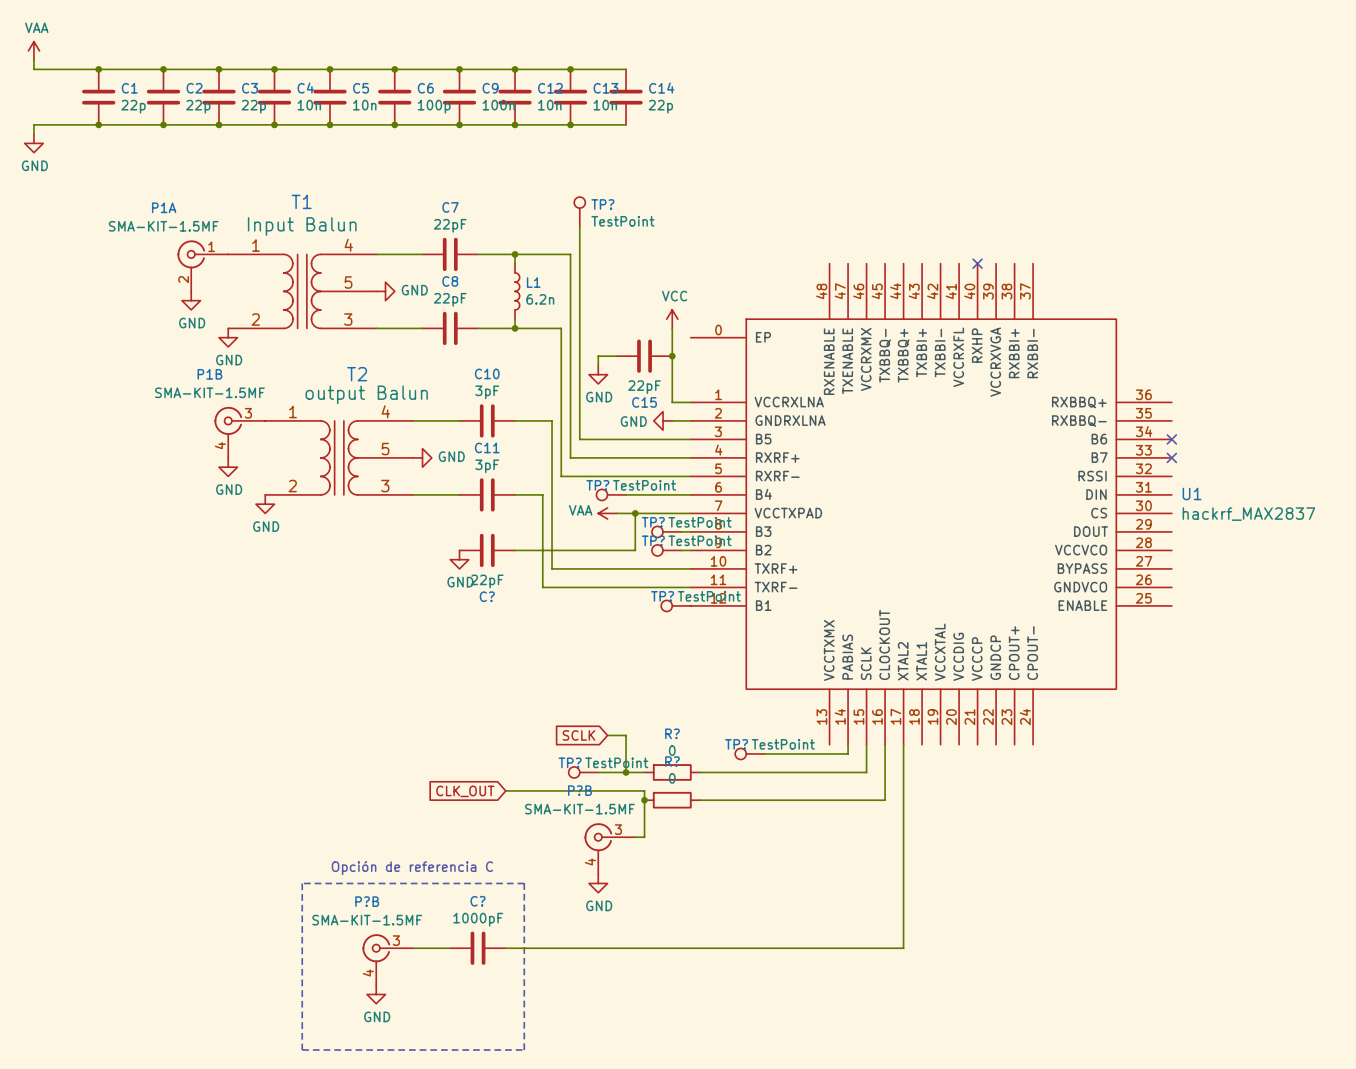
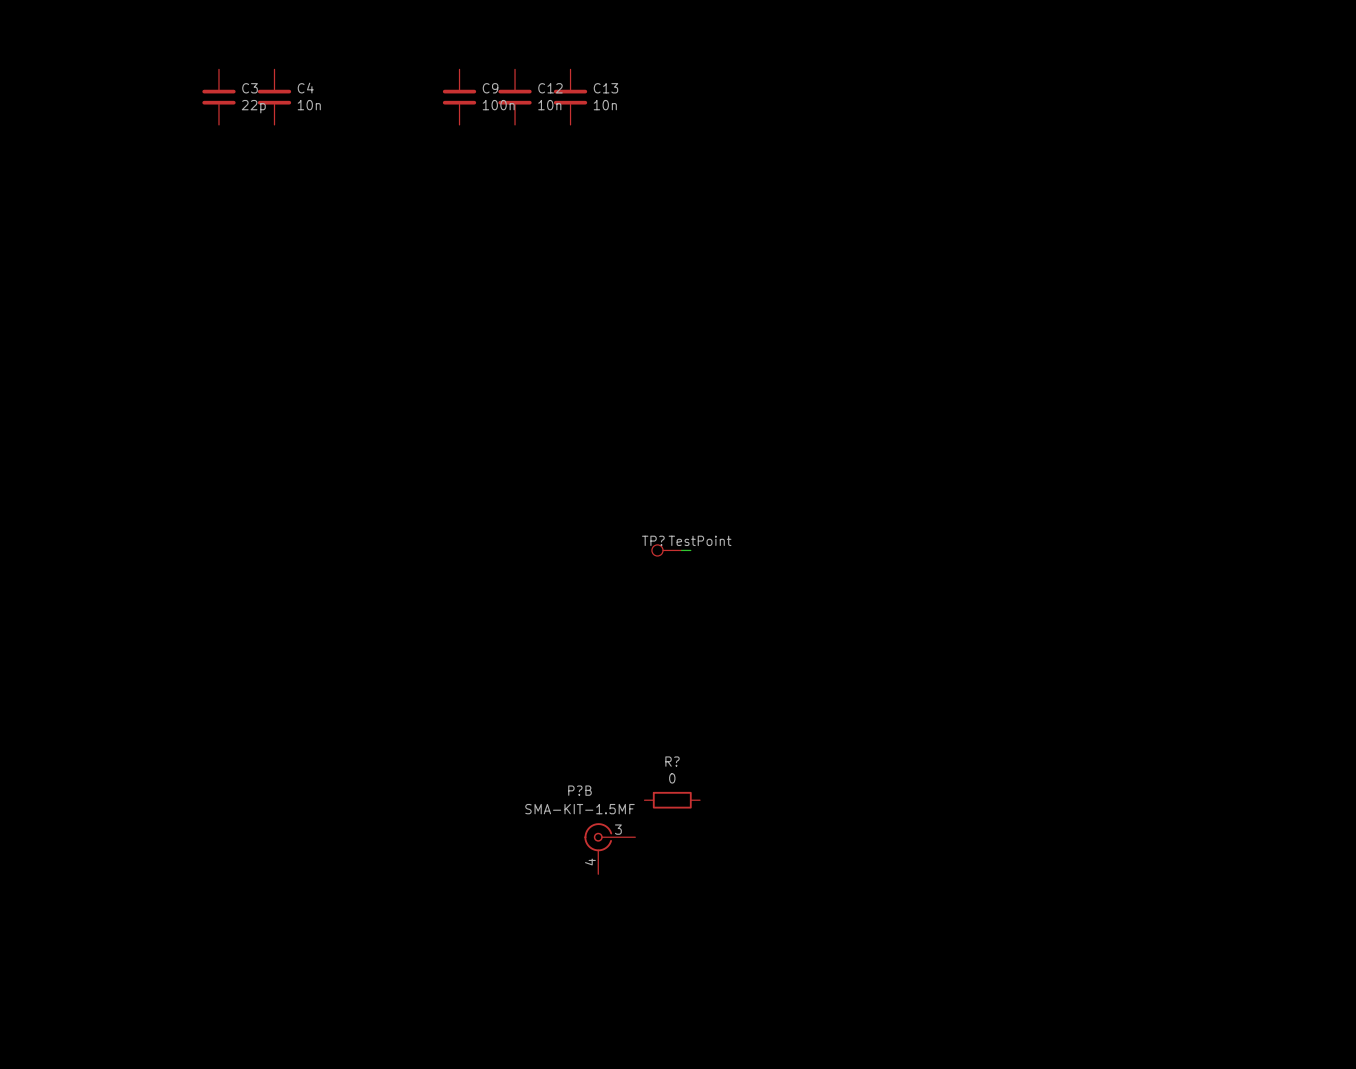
power symbol: VAA (33, 50) -> none
wire: (33, 60) (33, 69) (626, 69) -> none
junction: (98, 69) -> none
junction: (163, 69) -> none
junction: (218, 69) -> none
junction: (274, 69) -> none
junction: (330, 69) -> none
junction: (394, 69) -> none
junction: (459, 69) -> none
junction: (515, 69) -> none
junction: (570, 69) -> none
C1: 22p (98, 97) -> none
C2: 22p (163, 97) -> none
C5: 10n (330, 97) -> none
C6: 100p (394, 97) -> none
C14: 22p (626, 97) -> none
junction: (98, 124) -> none
junction: (163, 124) -> none
junction: (218, 124) -> none
junction: (274, 124) -> none
junction: (330, 124) -> none
junction: (394, 124) -> none
junction: (459, 124) -> none
junction: (515, 124) -> none
junction: (570, 124) -> none
wire: (626, 124) (33, 124) (33, 134) -> none
power symbol: GND (33, 143) -> none
TP?: TestPoint (579, 211) -> none
wire: (579, 226) (579, 439) (690, 439) -> none
wire: (376, 254) (422, 254) -> none
C7: 22pF (450, 254) -> none
wire: (478, 254) (570, 254) (570, 457) (690, 457) -> none
wire: (515, 254) (515, 263) -> none
junction: (515, 254) -> none
no-connect mark: (977, 263) -> none
P1A: SMA-KIT-1.5MF (202, 265) -> none
T1: Input Balun (302, 291) -> none
power symbol: GND (385, 291) -> none
L1: 6.2n (517, 291) -> none
power symbol: GND (191, 300) -> none
wire: (515, 319) (515, 328) -> none
power symbol: VCC (672, 319) -> none
wire: (376, 328) (422, 328) -> none
C8: 22pF (450, 328) -> none
wire: (478, 328) (561, 328) (561, 476) (690, 476) -> none
junction: (515, 328) -> none
wire: (672, 328) (672, 402) (690, 402) -> none
power symbol: GND (228, 337) -> none
wire: (616, 356) (598, 356) (598, 365) -> none
C15: 22pF (644, 356) -> none
junction: (672, 356) -> none
power symbol: GND (598, 374) -> none
wire: (413, 420) (459, 420) -> none
C10: 3pF (487, 420) -> none
wire: (515, 420) (552, 420) (552, 568) (690, 568) -> none
power symbol: GND (663, 420) -> none
wire: (672, 420) (690, 420) -> none
P1B: SMA-KIT-1.5MF (239, 432) -> none
no-connect mark: (1171, 439) -> none
T2: output Balun (339, 457) -> none
power symbol: GND (422, 457) -> none
no-connect mark: (1171, 457) -> none
power symbol: GND (228, 467) -> none
wire: (413, 494) (459, 494) -> none
C11: 3pF (487, 494) -> none
wire: (515, 494) (542, 494) (542, 587) (690, 587) -> none
TP?: TestPoint (611, 494) -> none
wire: (626, 494) (690, 494) -> none
power symbol: GND (265, 504) -> none
U1: hackrf_MAX2837 (931, 504) -> none
power symbol: VAA (607, 513) -> none
wire: (616, 513) (690, 513) -> none
wire: (635, 513) (635, 550) (515, 550) -> none
junction: (635, 513) -> none
TP?: TestPoint (666, 531) -> none
wire: (681, 531) (690, 531) -> none
C?: 22pF (487, 550) -> none
power symbol: GND (459, 559) -> none
TP?: TestPoint (675, 605) -> none
global label: SCLK (578, 735) -> none
wire: (607, 735) (626, 735) (626, 772) -> none
wire: (848, 744) (848, 753) (764, 753) -> none
wire: (866, 744) (866, 772) (700, 772) -> none
wire: (885, 744) (885, 800) (700, 800) -> none
wire: (903, 744) (903, 948) (505, 948) -> none
TP?: TestPoint (749, 753) -> none
TP?: TestPoint (583, 772) -> none
wire: (598, 772) (644, 772) -> none
junction: (626, 772) -> none
R?: 0 (672, 772) -> none
wire: (505, 790) (644, 790) (644, 837) (635, 837) -> none
global label: CLK_OUT (465, 791) -> none
junction: (644, 800) -> none
text: Opción de referencia C (412, 867) -> none
line: (302, 883) (302, 1049) (524, 1049) (524, 883) (302, 883) -> none
power symbol: GND (598, 883) -> none
wire: (413, 948) (450, 948) -> none
C?: 1000pF (478, 948) -> none
P?B: SMA-KIT-1.5MF (387, 959) -> none
power symbol: GND (376, 994) -> none

